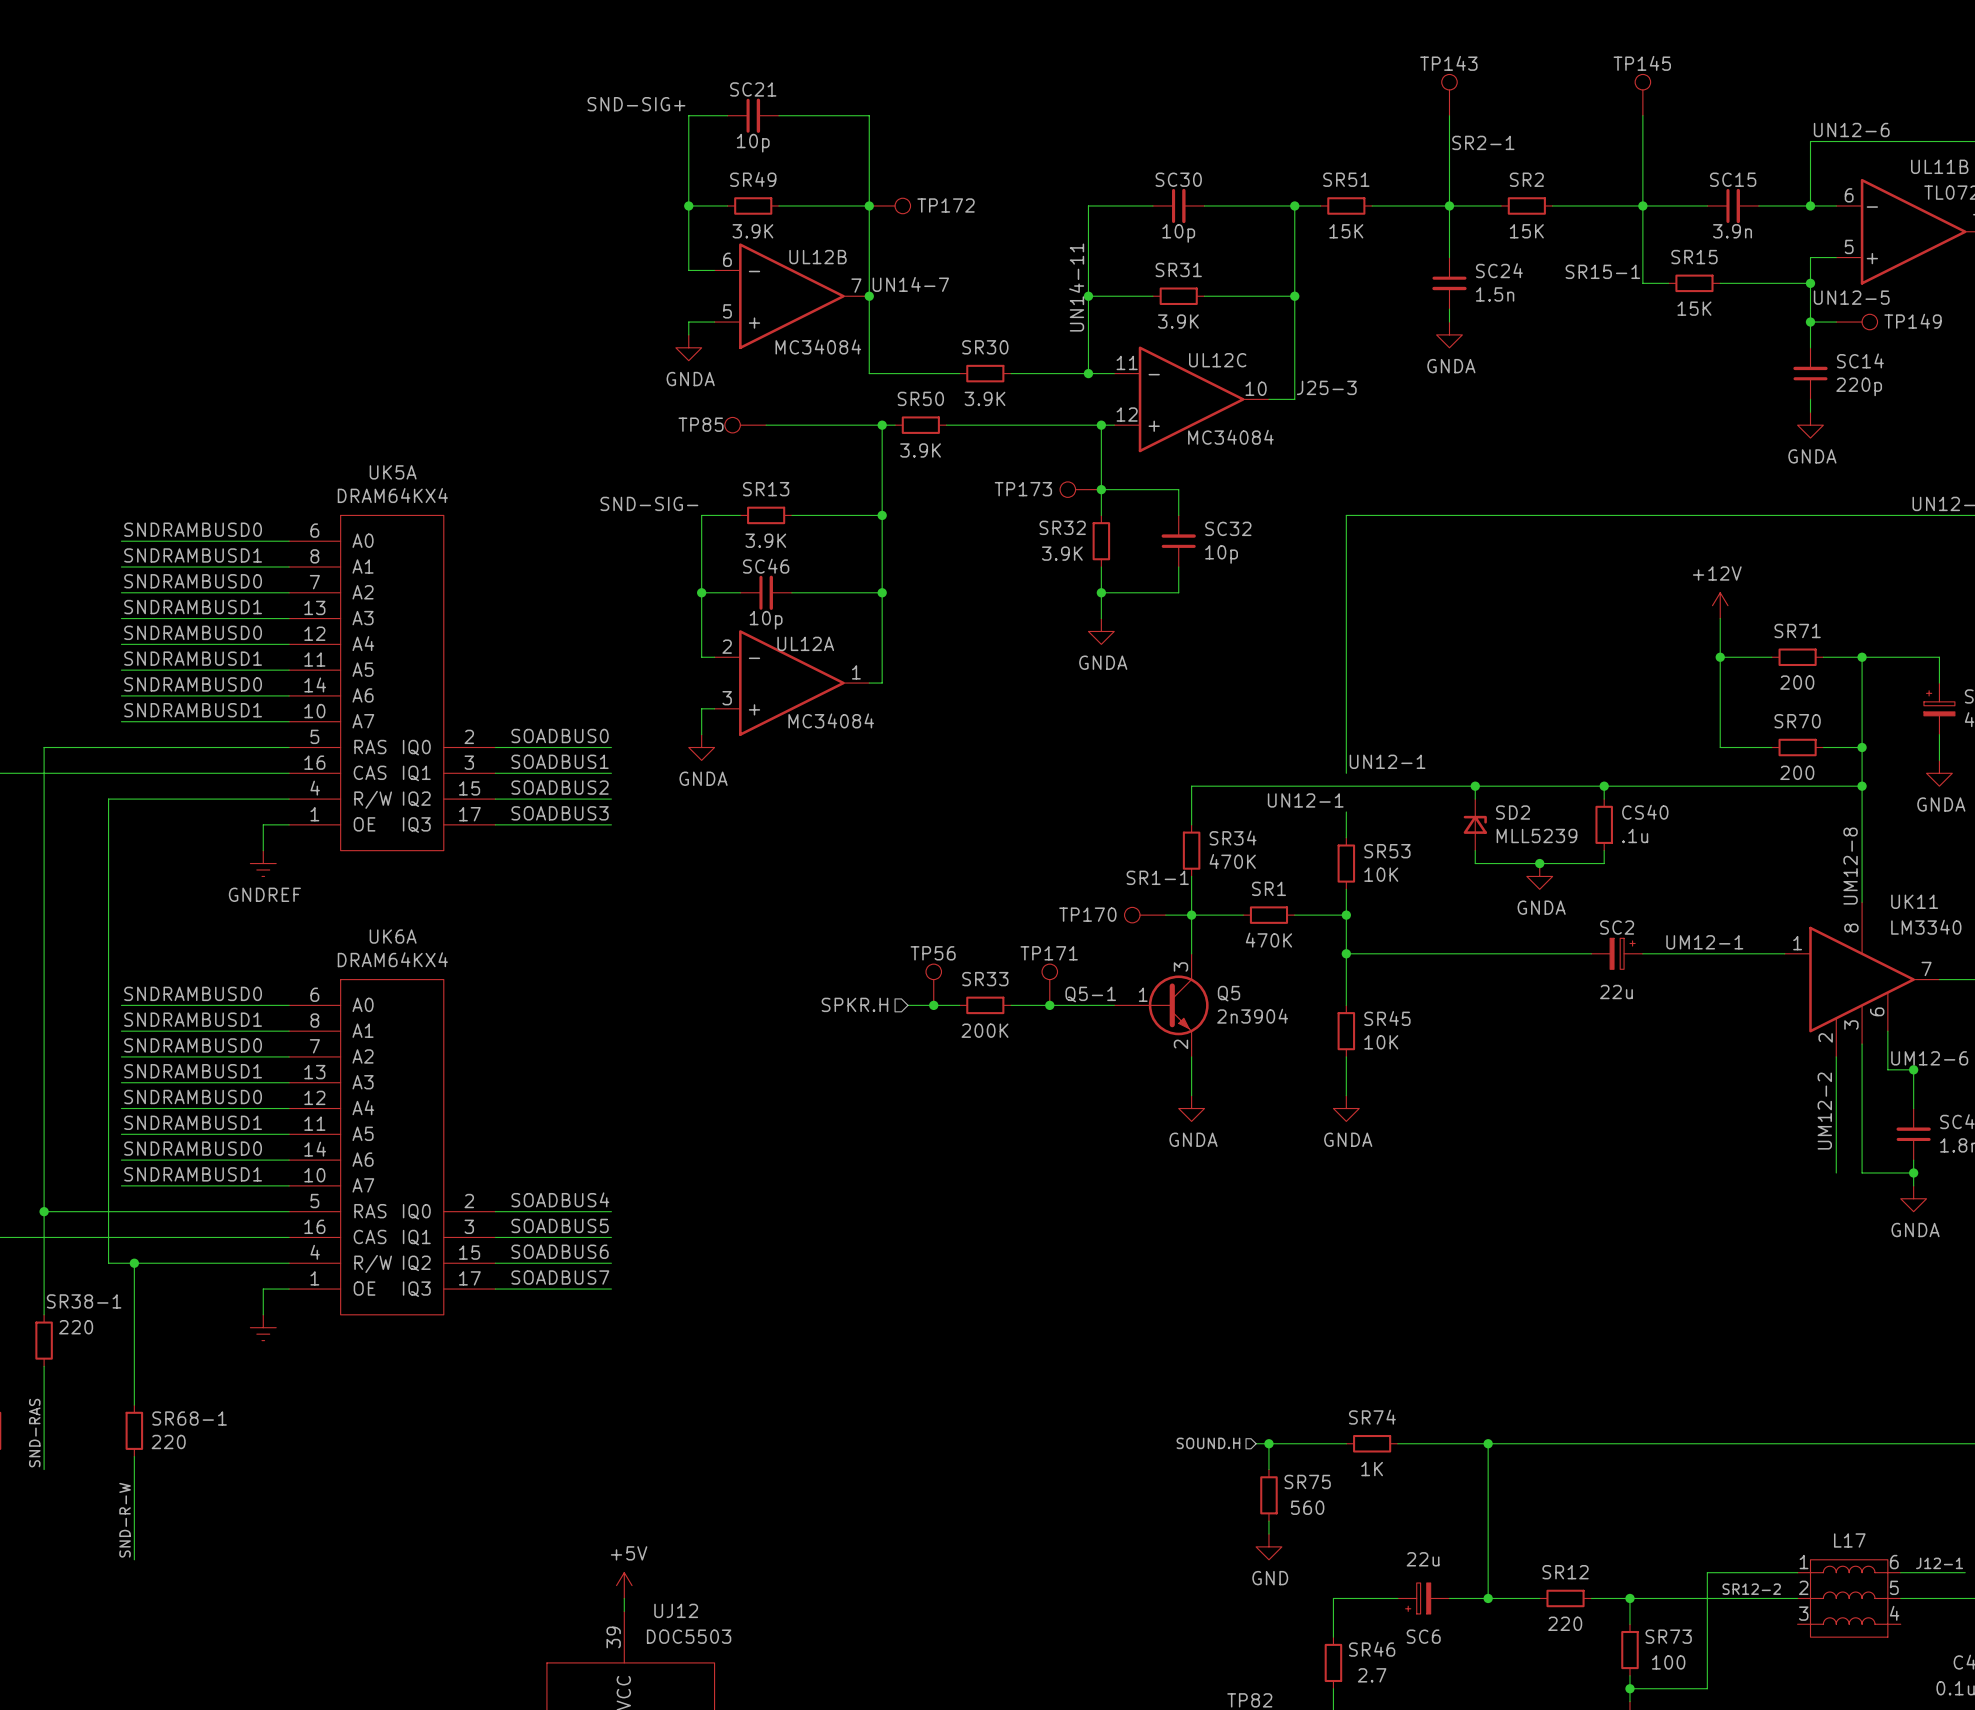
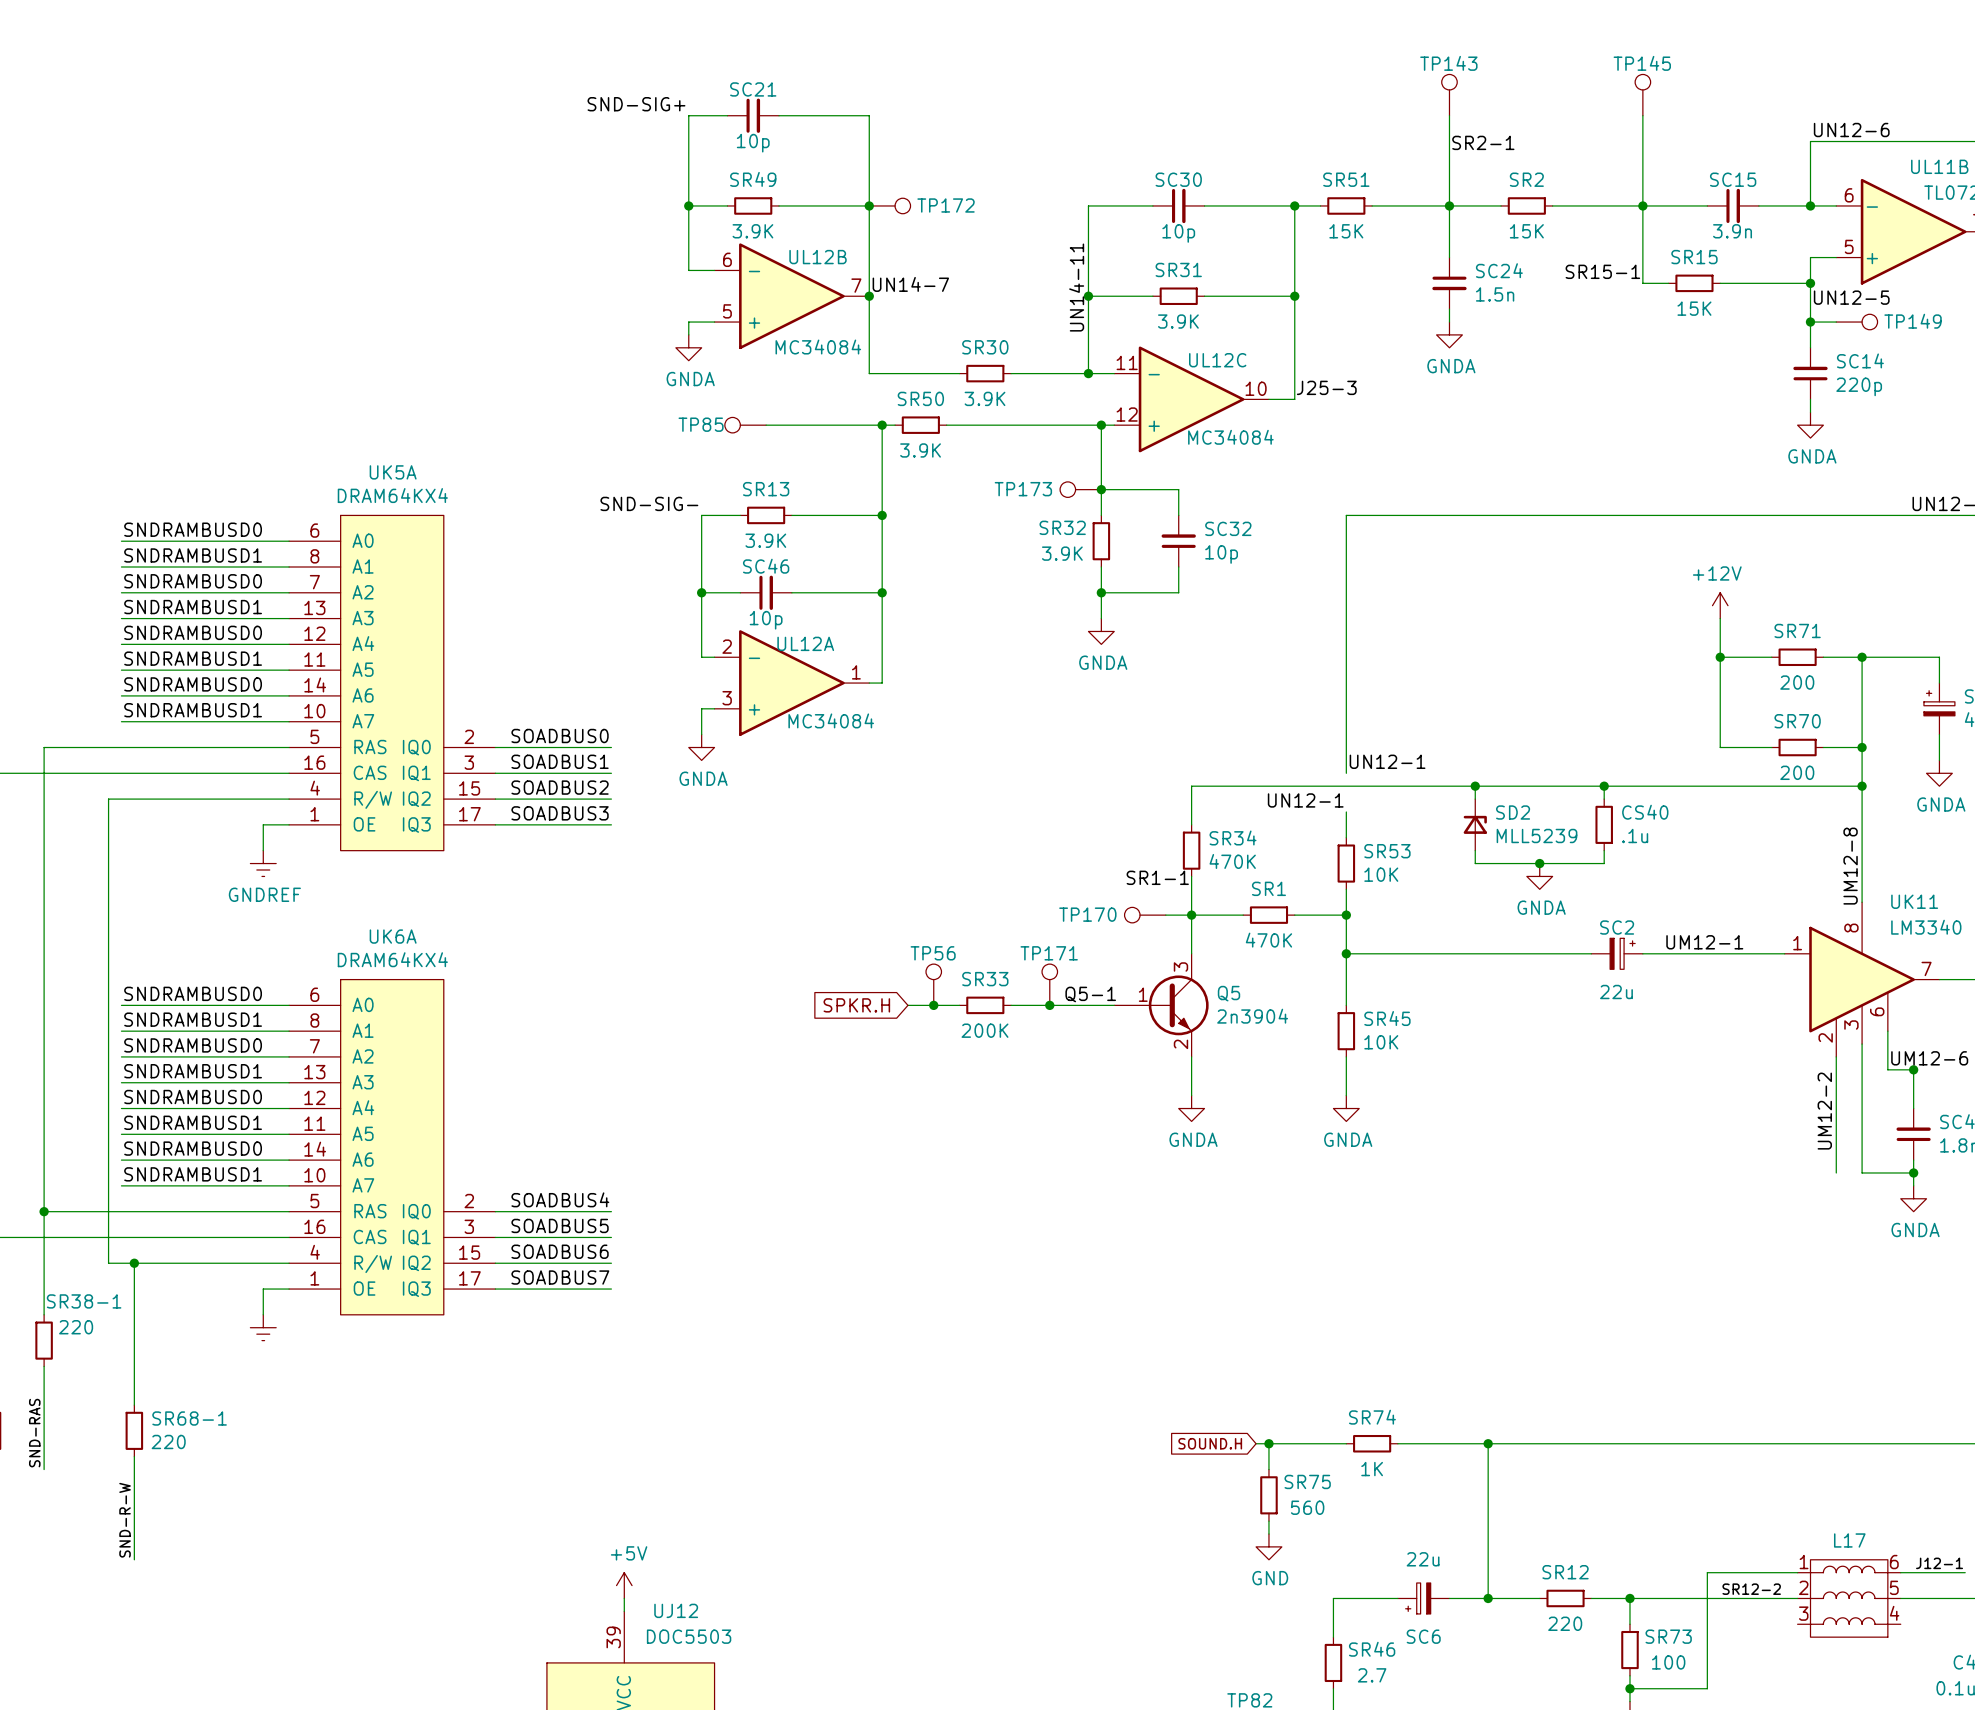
hierarchical label: SPKR.H (854, 1004) -> none
global label: none -> SPKR.H (856, 1005)
hierarchical label: SOUND.H (1208, 1443) -> none
global label: none -> SOUND.H (1210, 1443)

